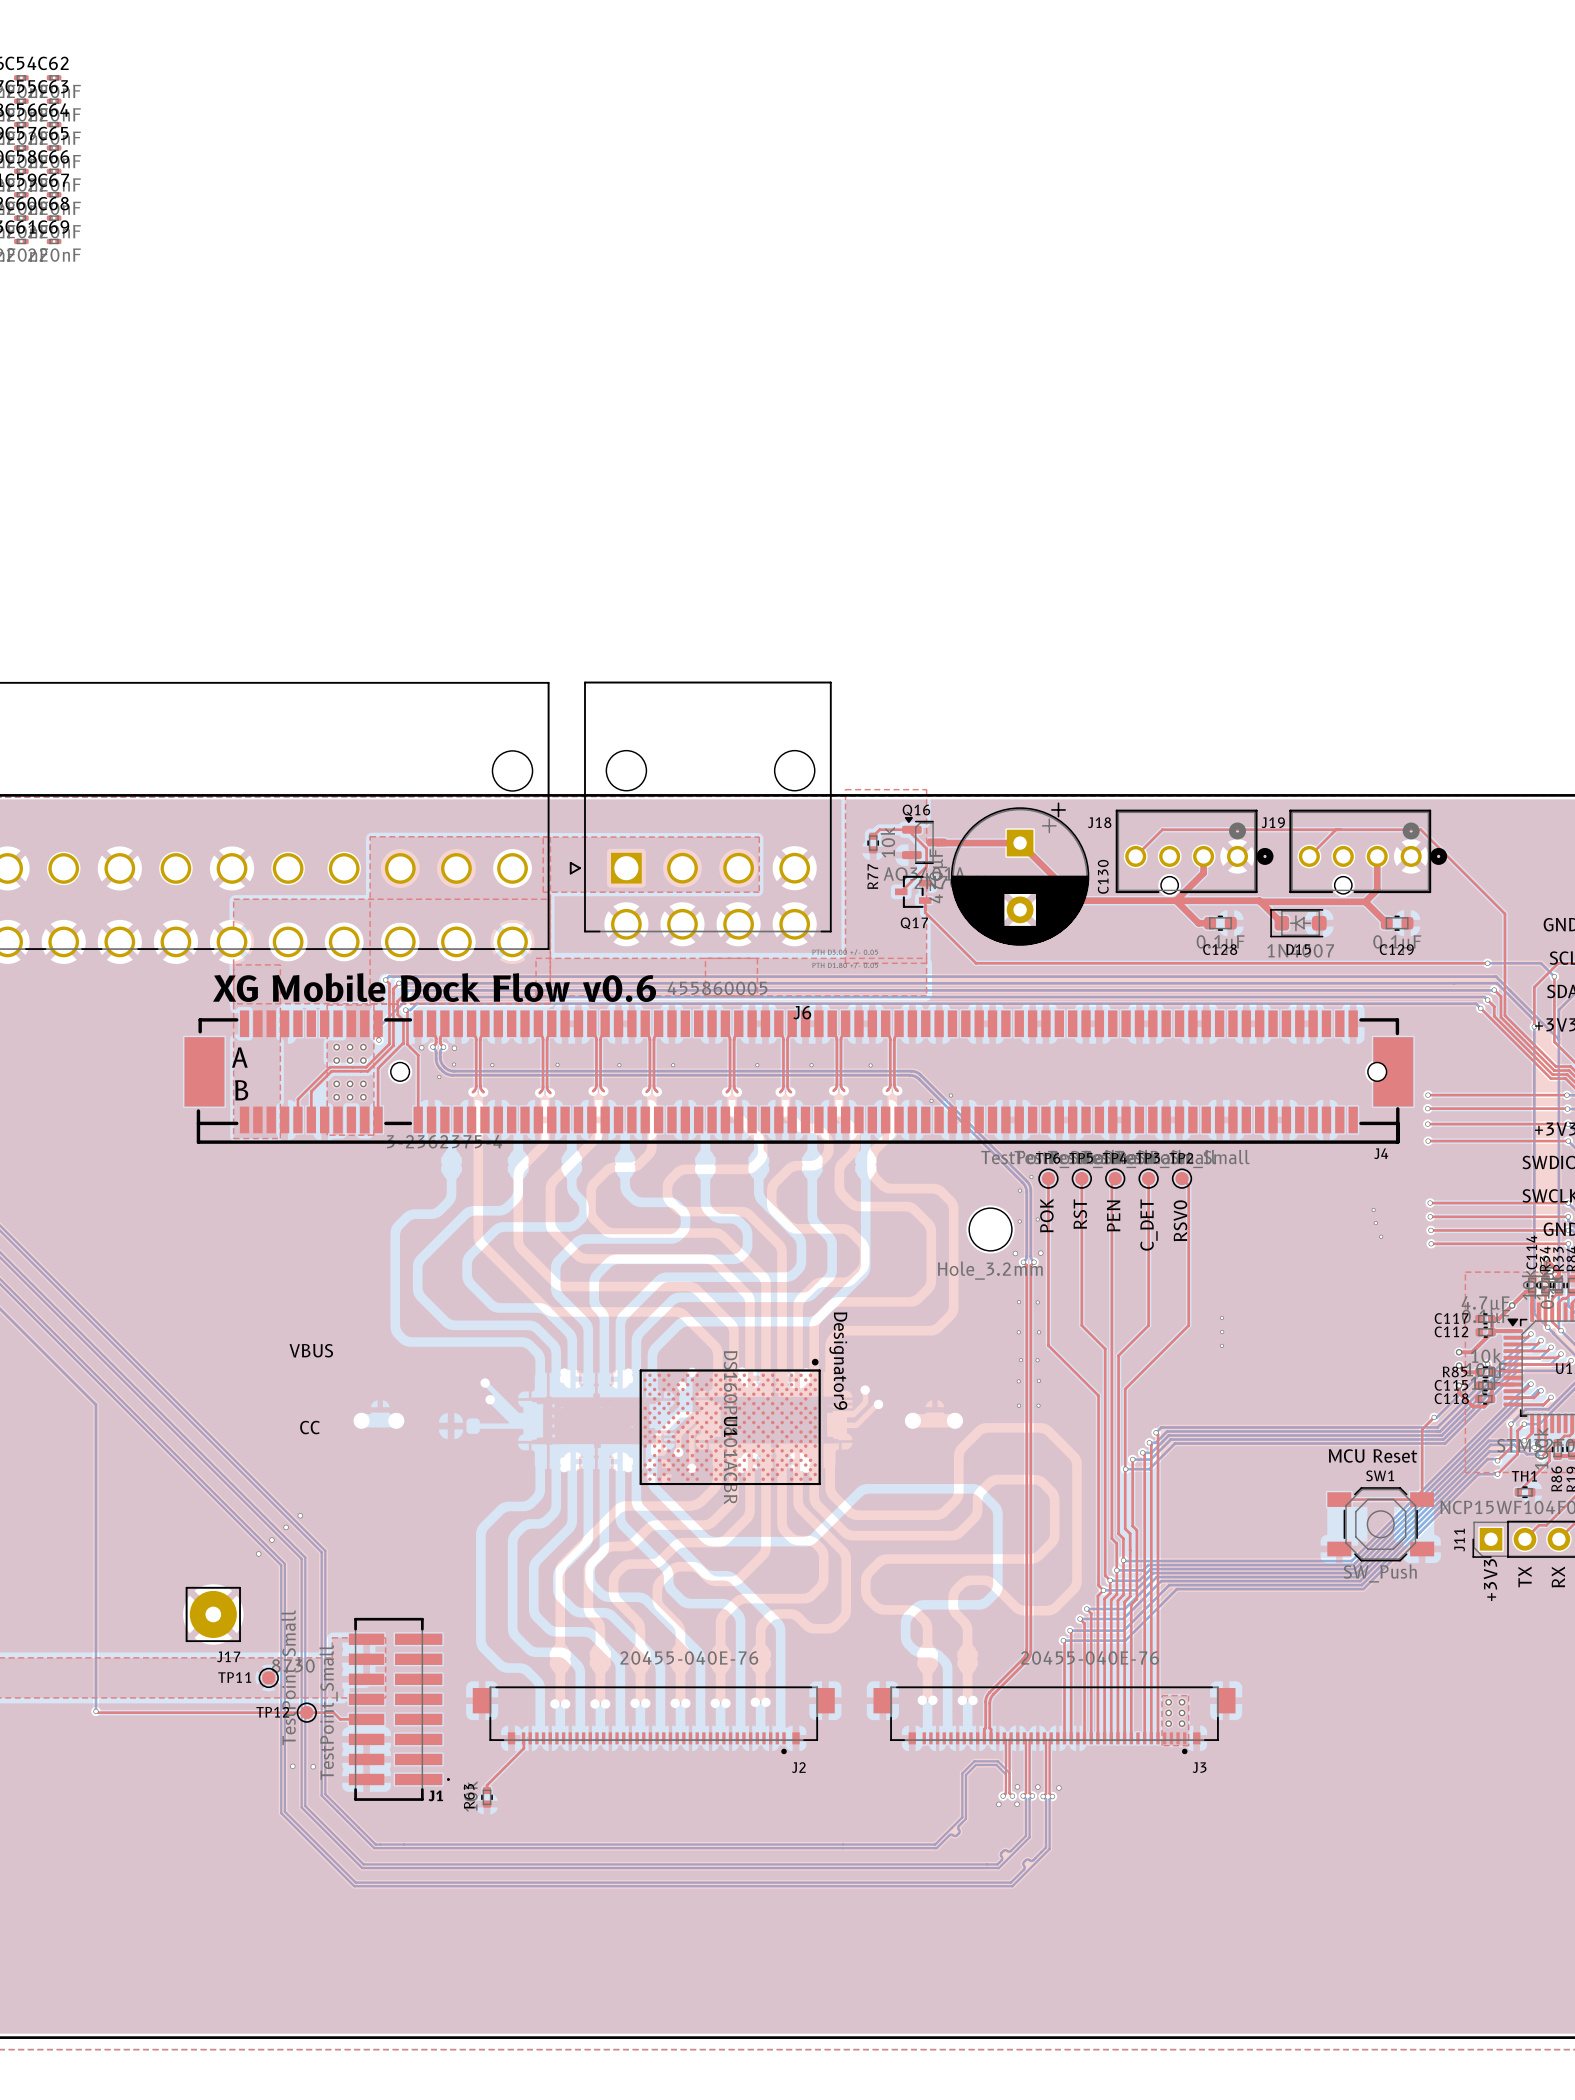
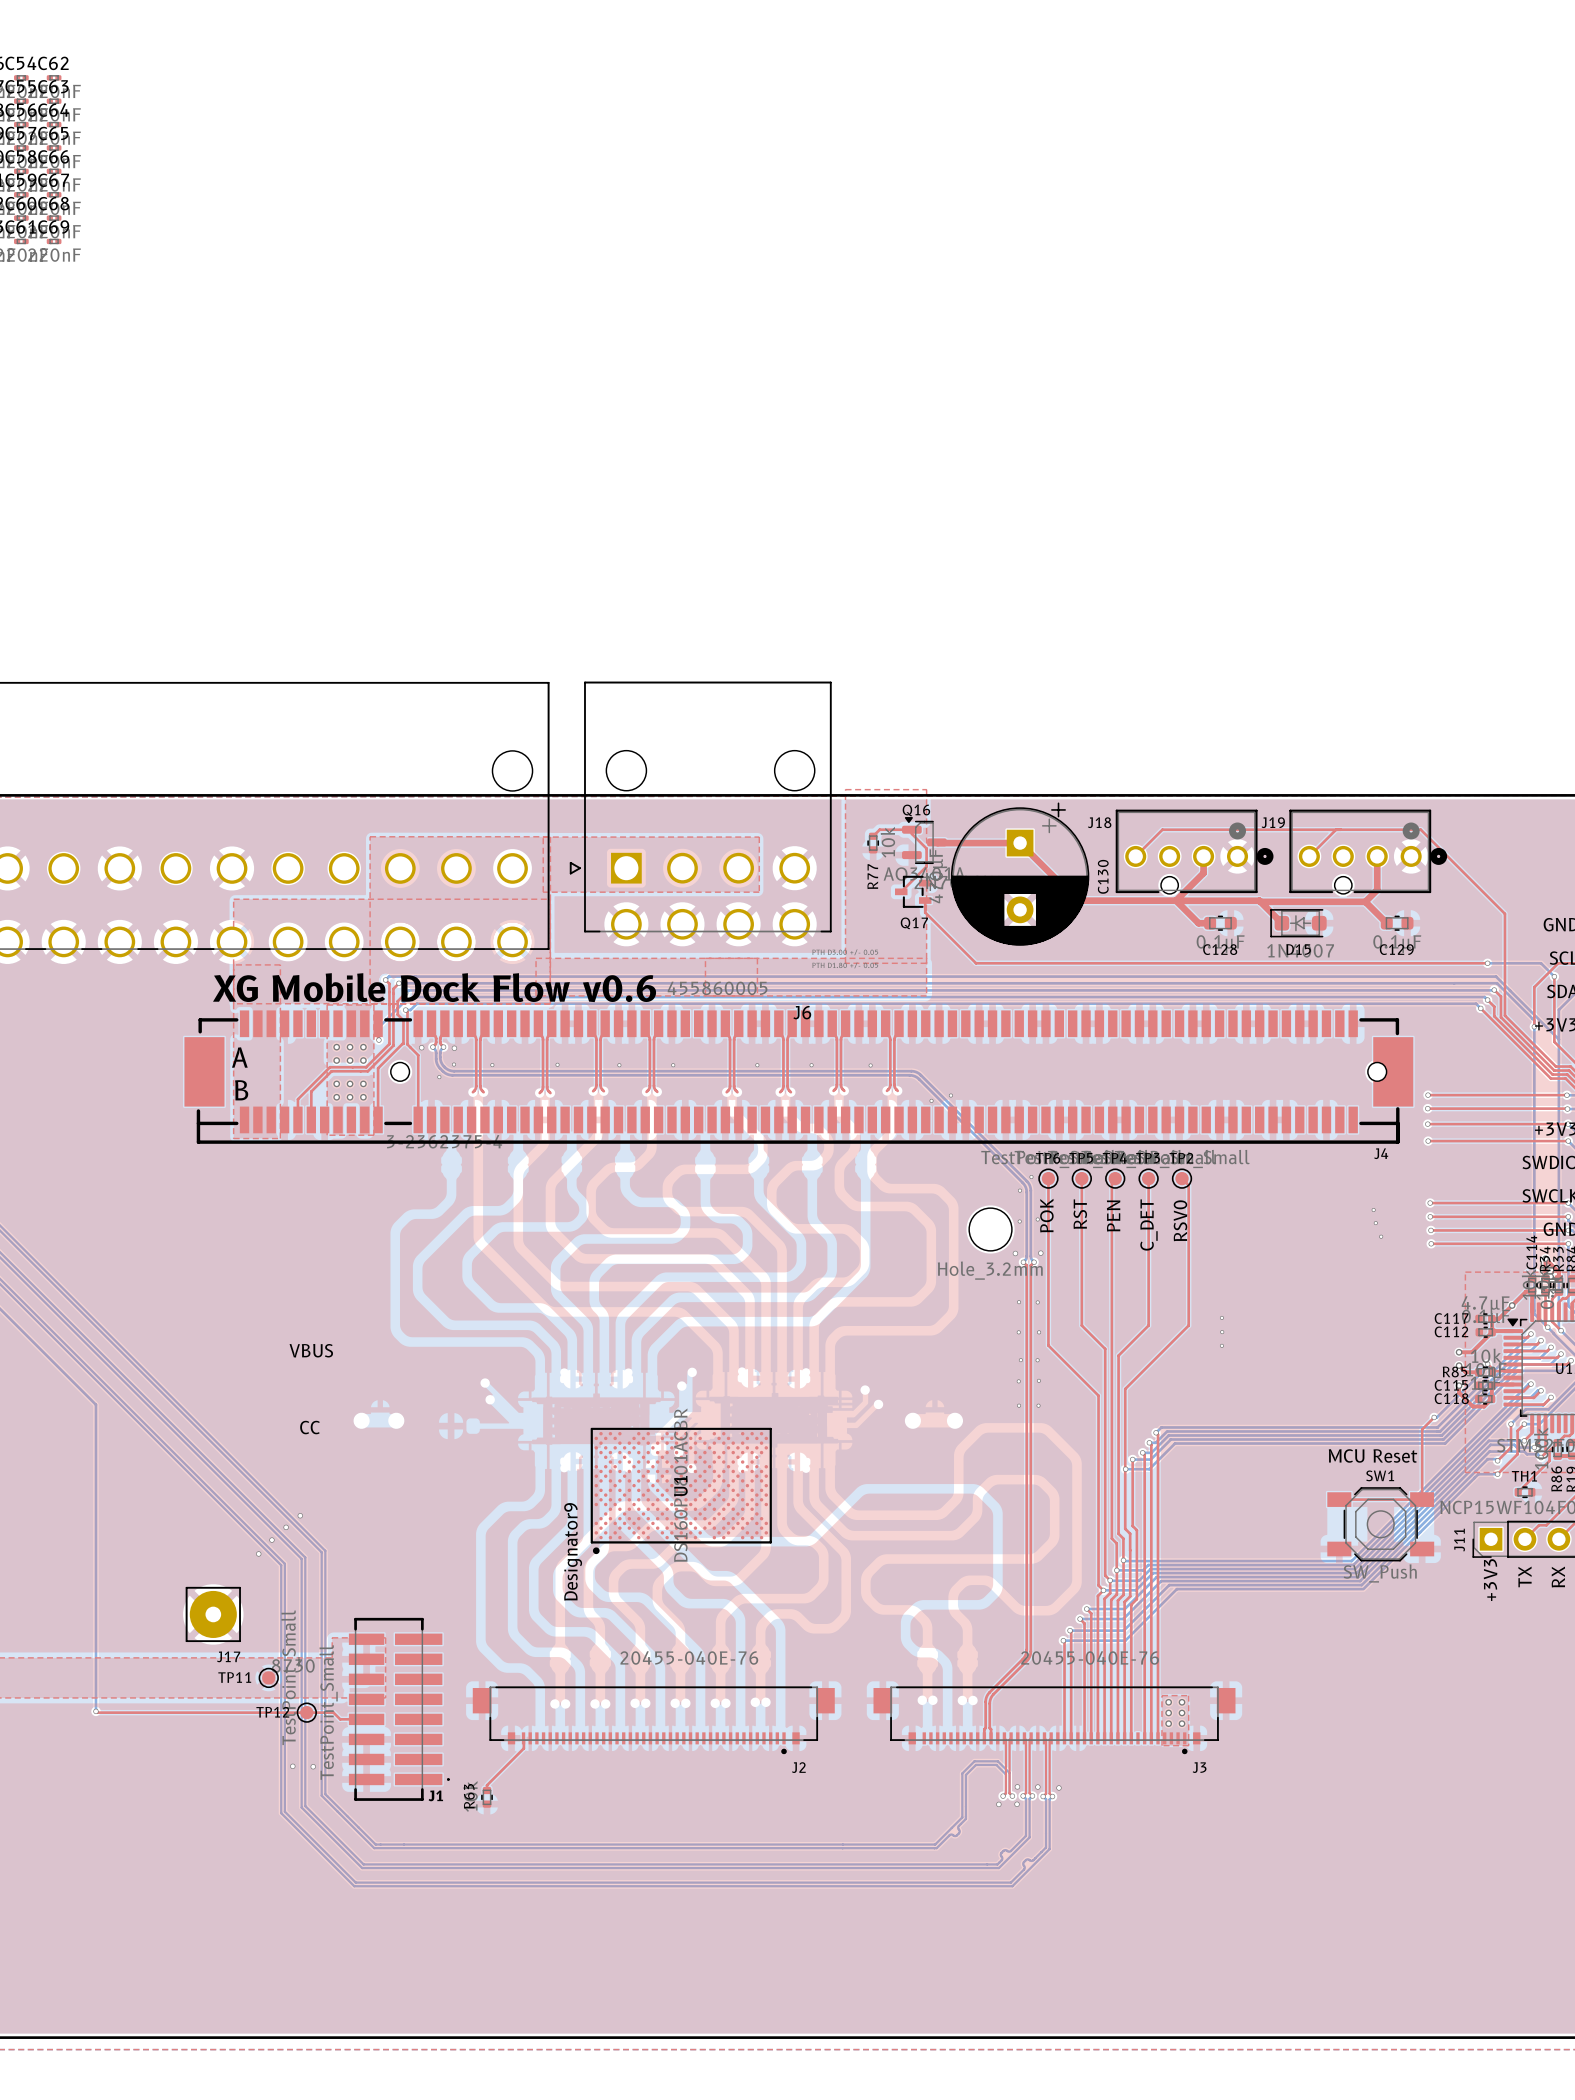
U1 rotation: 0° (730, 1421) -> 180° (681, 1490)

